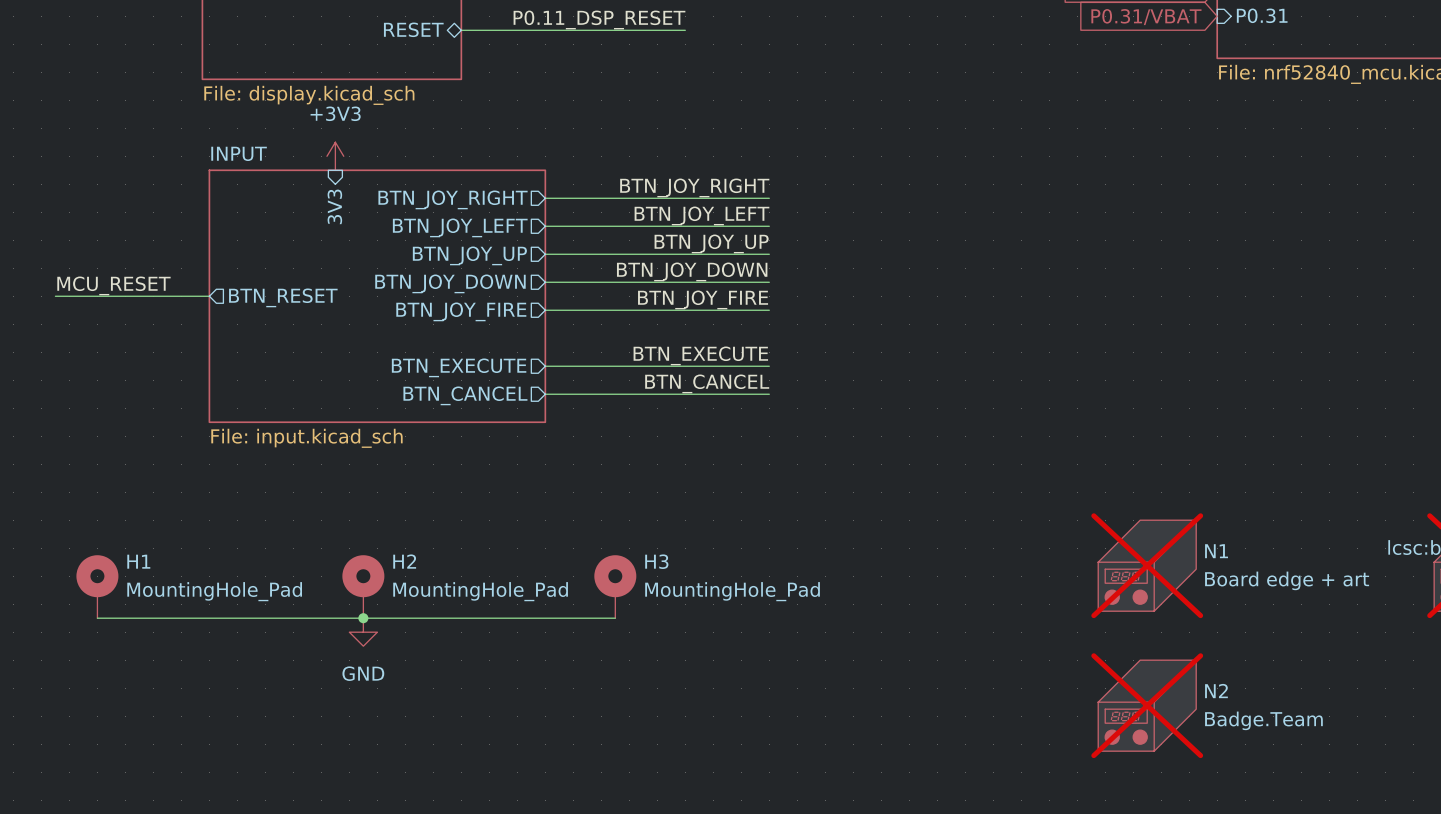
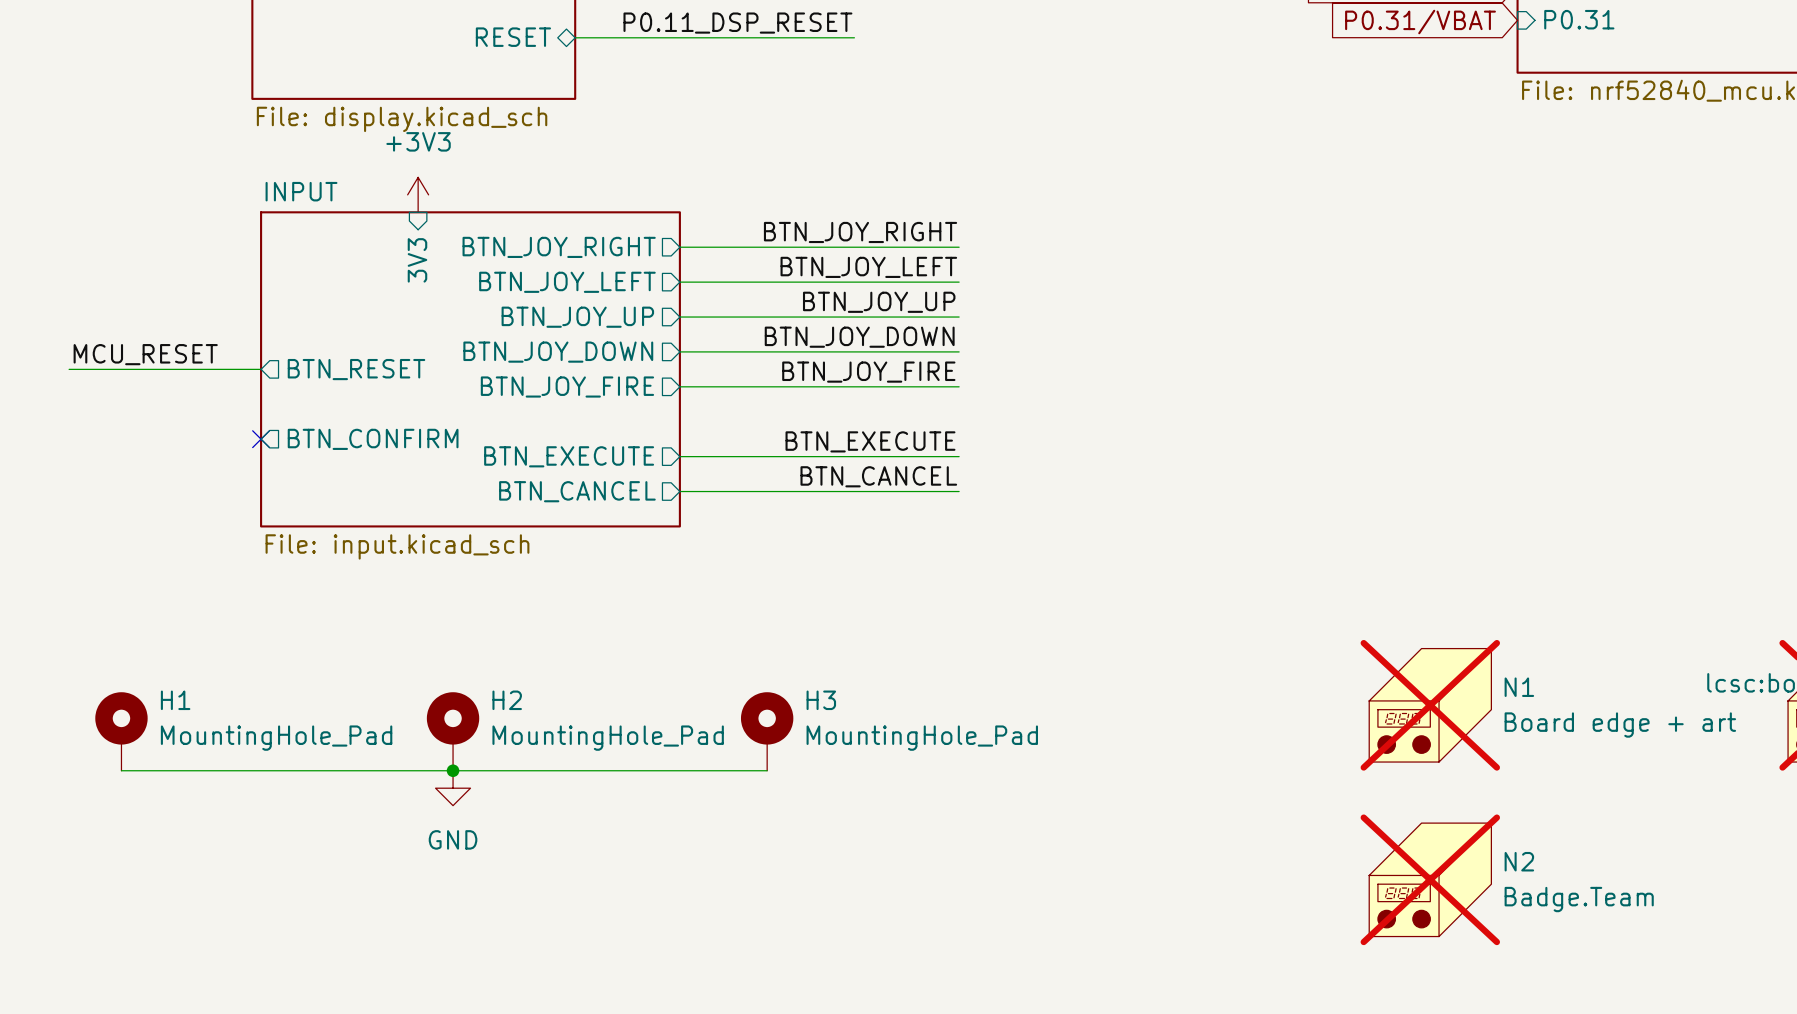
no-connect mark: none -> (261, 439)
sheet pin: none -> BTN_CONFIRM (373, 439)

